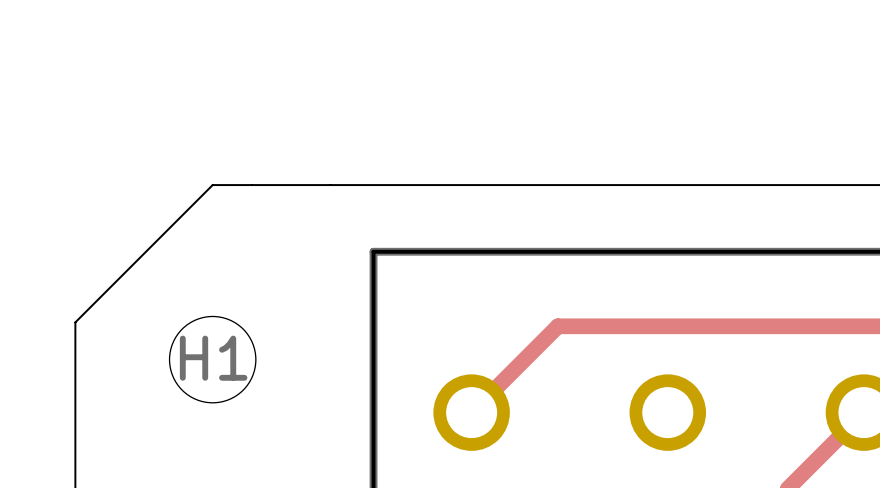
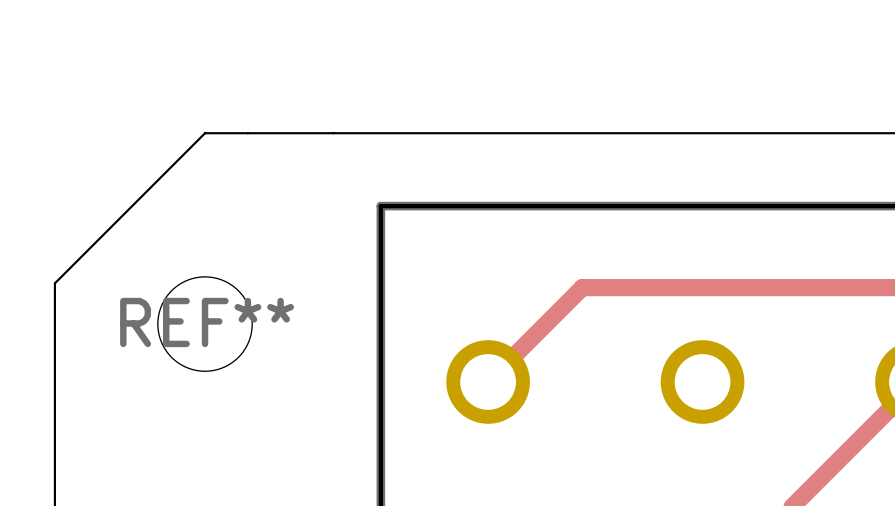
H1 name: H1 (213, 358) -> REF** (207, 322)

